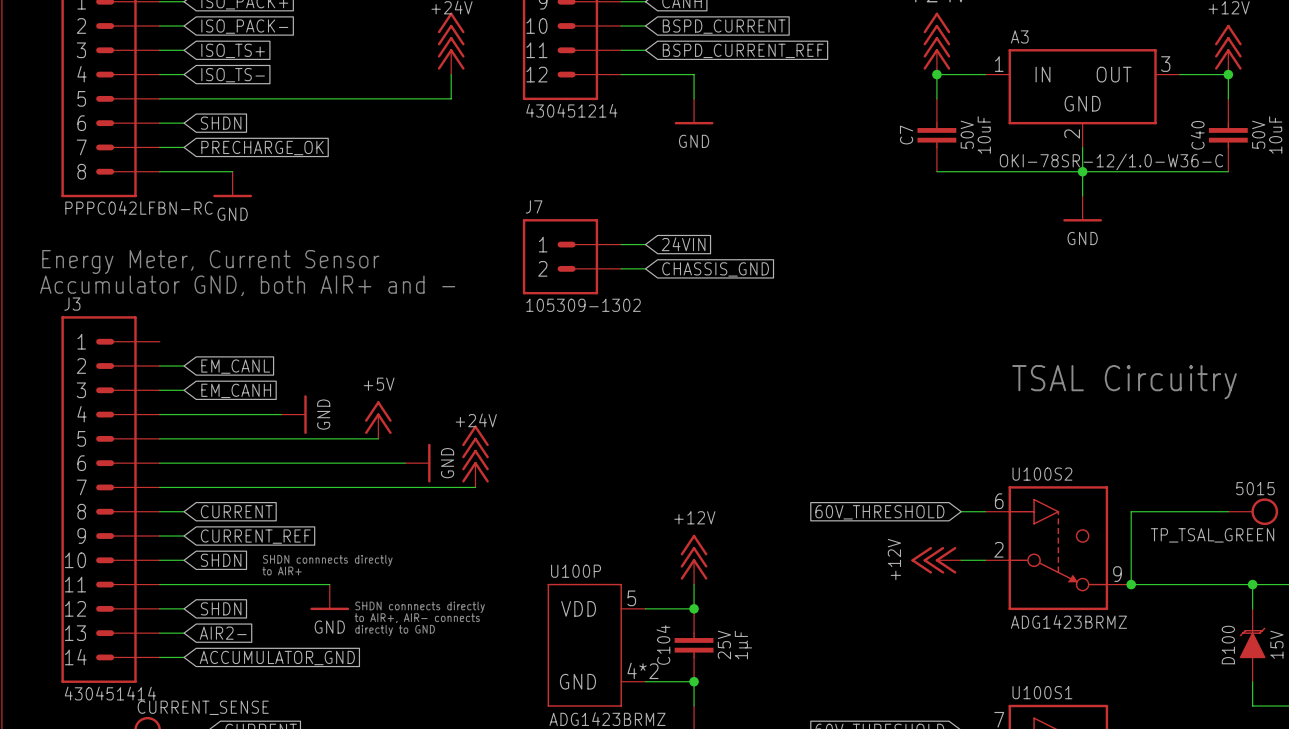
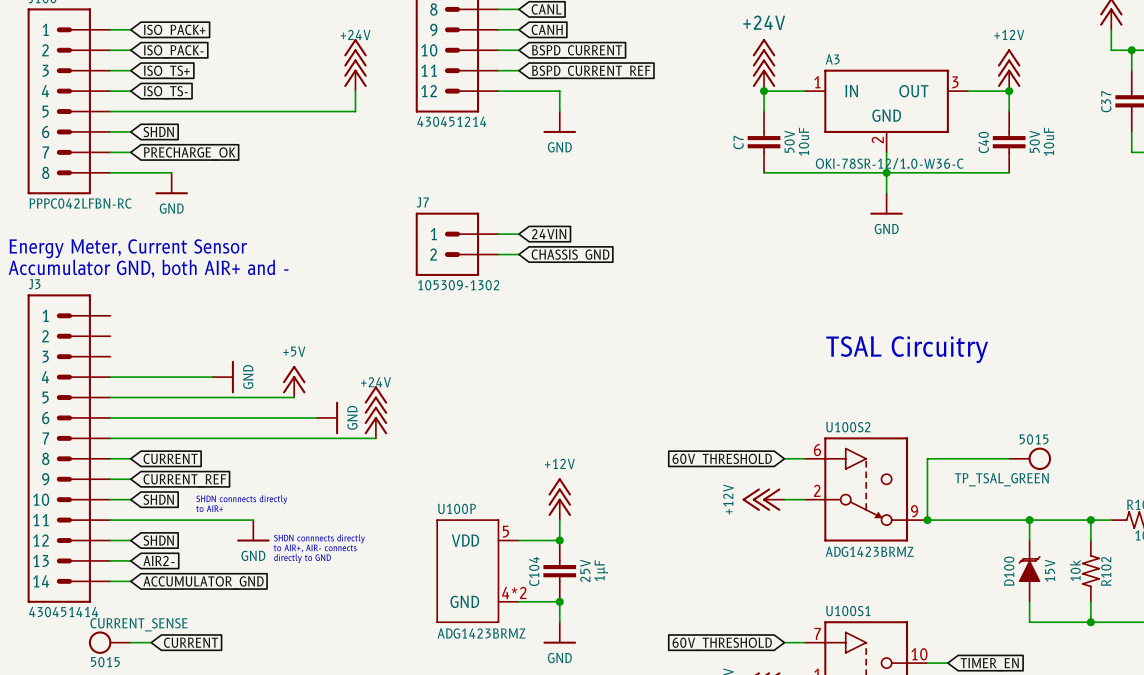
wire: (159, 366) (184, 366) -> none
global label: EM_CANL (235, 366) -> none
wire: (159, 390) (184, 390) -> none
global label: EM_CANH (236, 390) -> none

